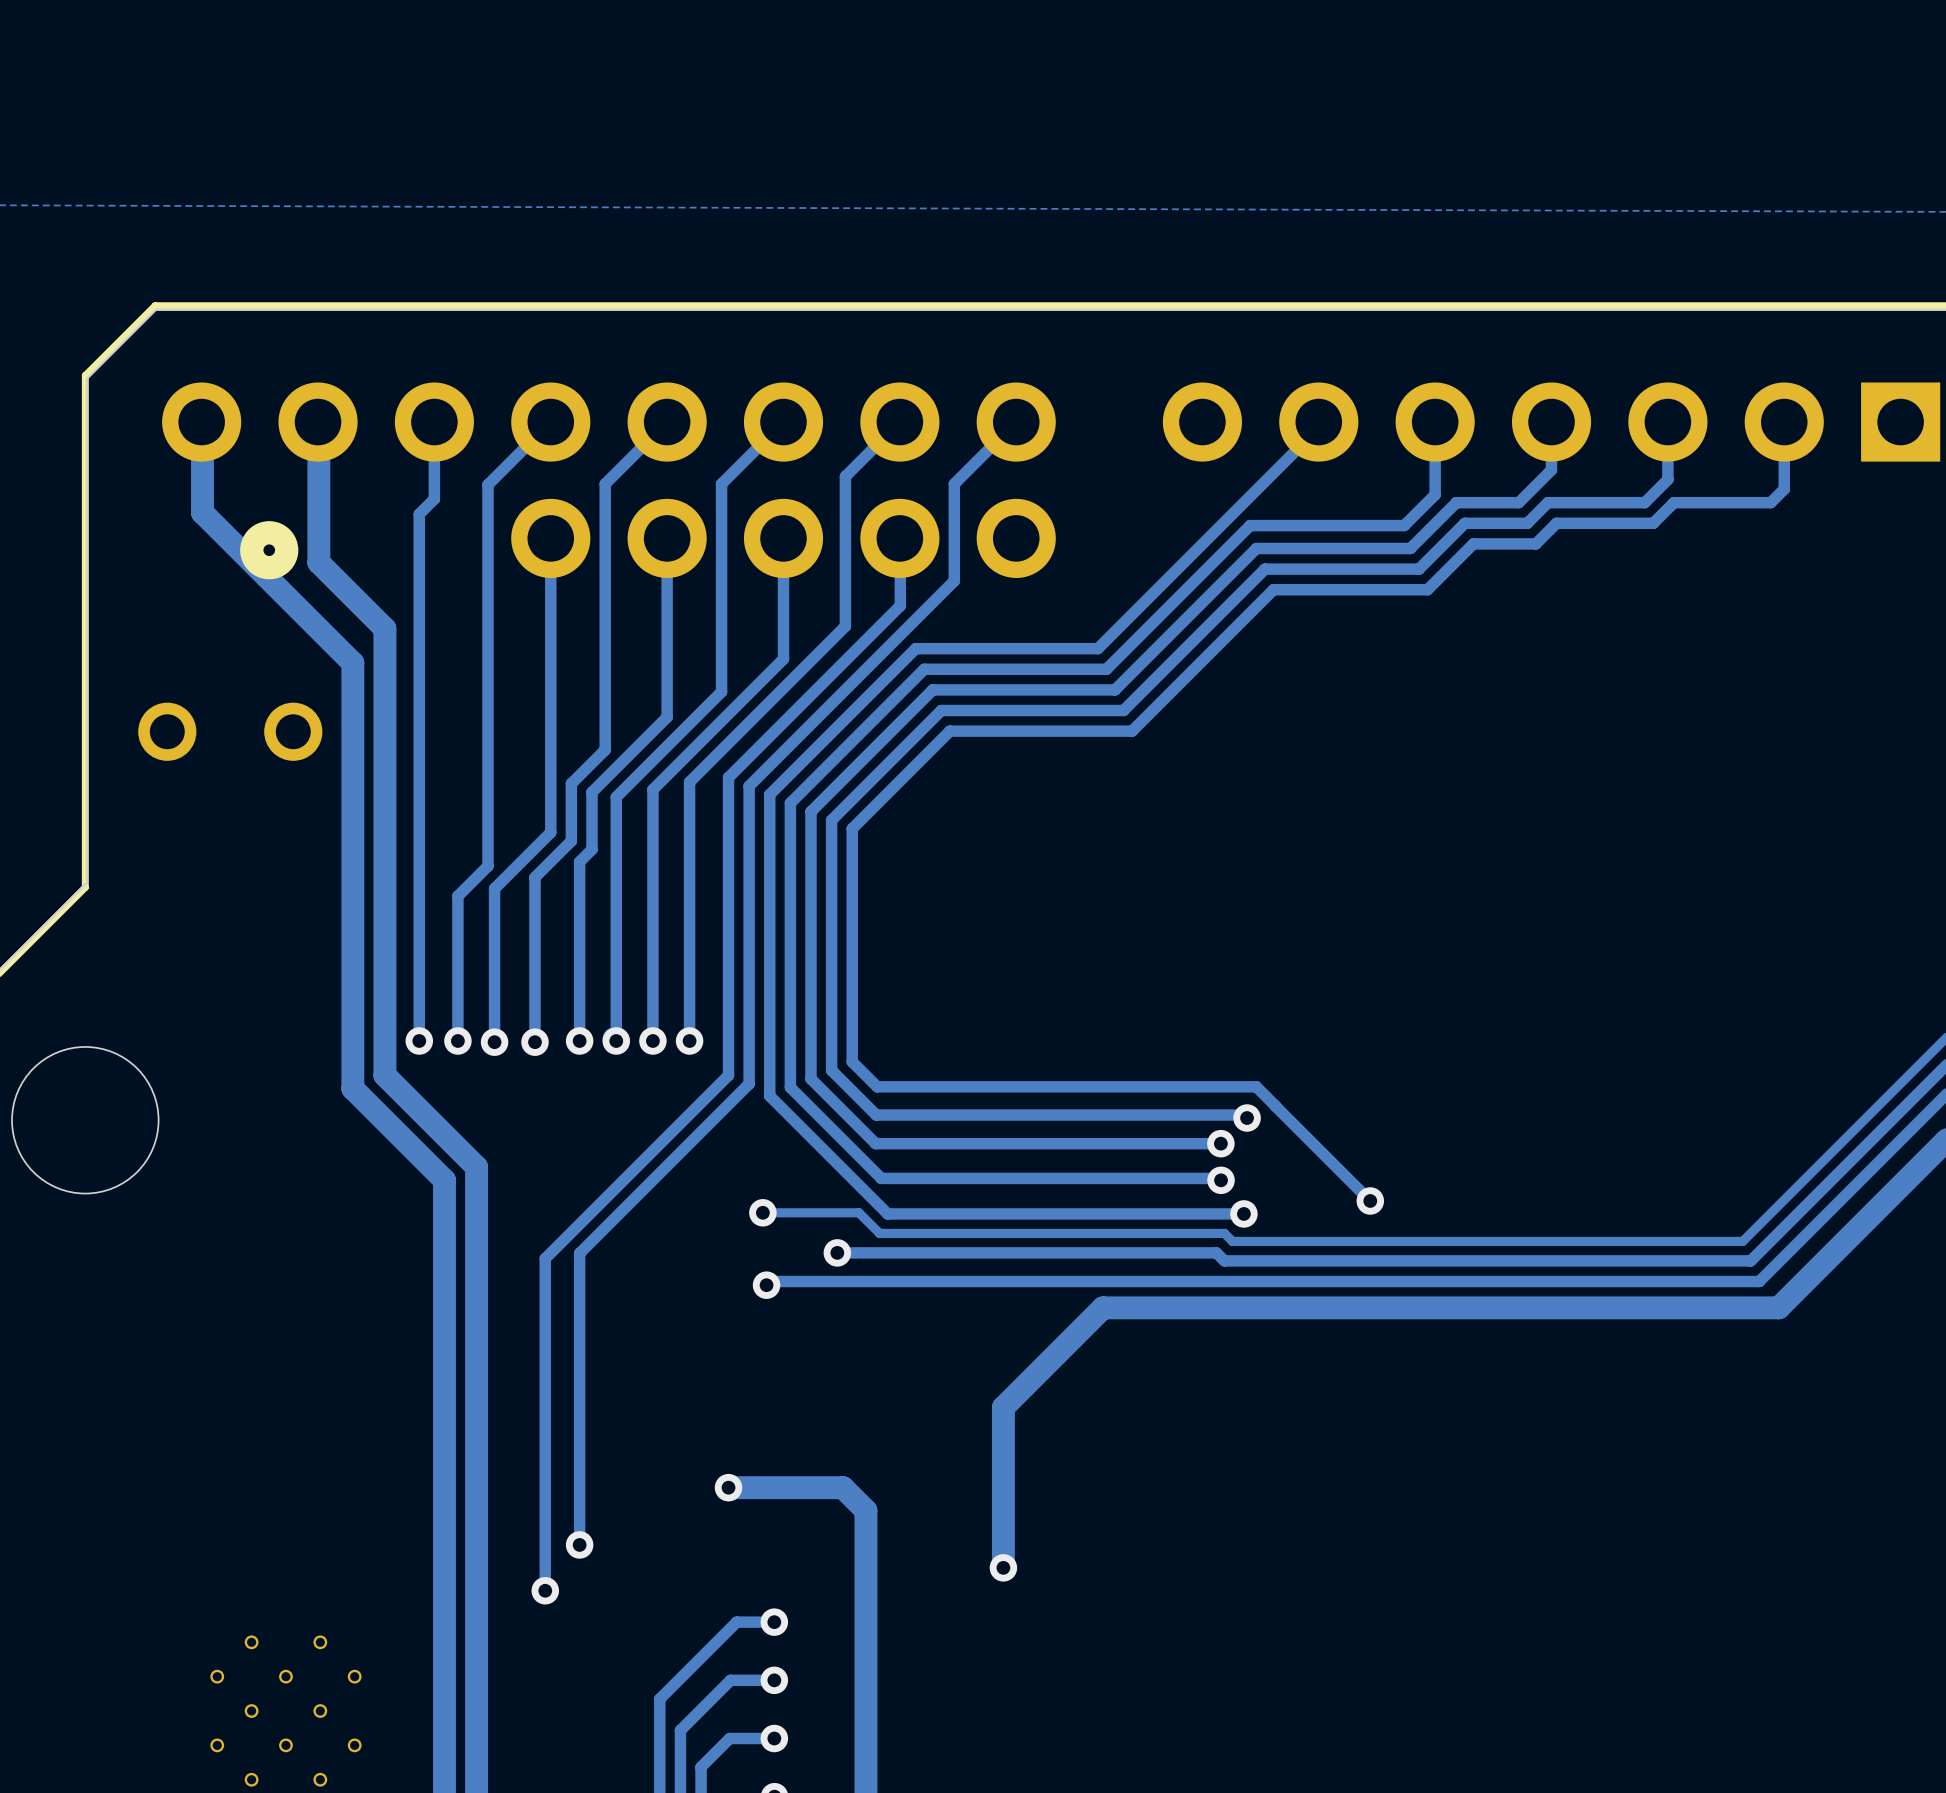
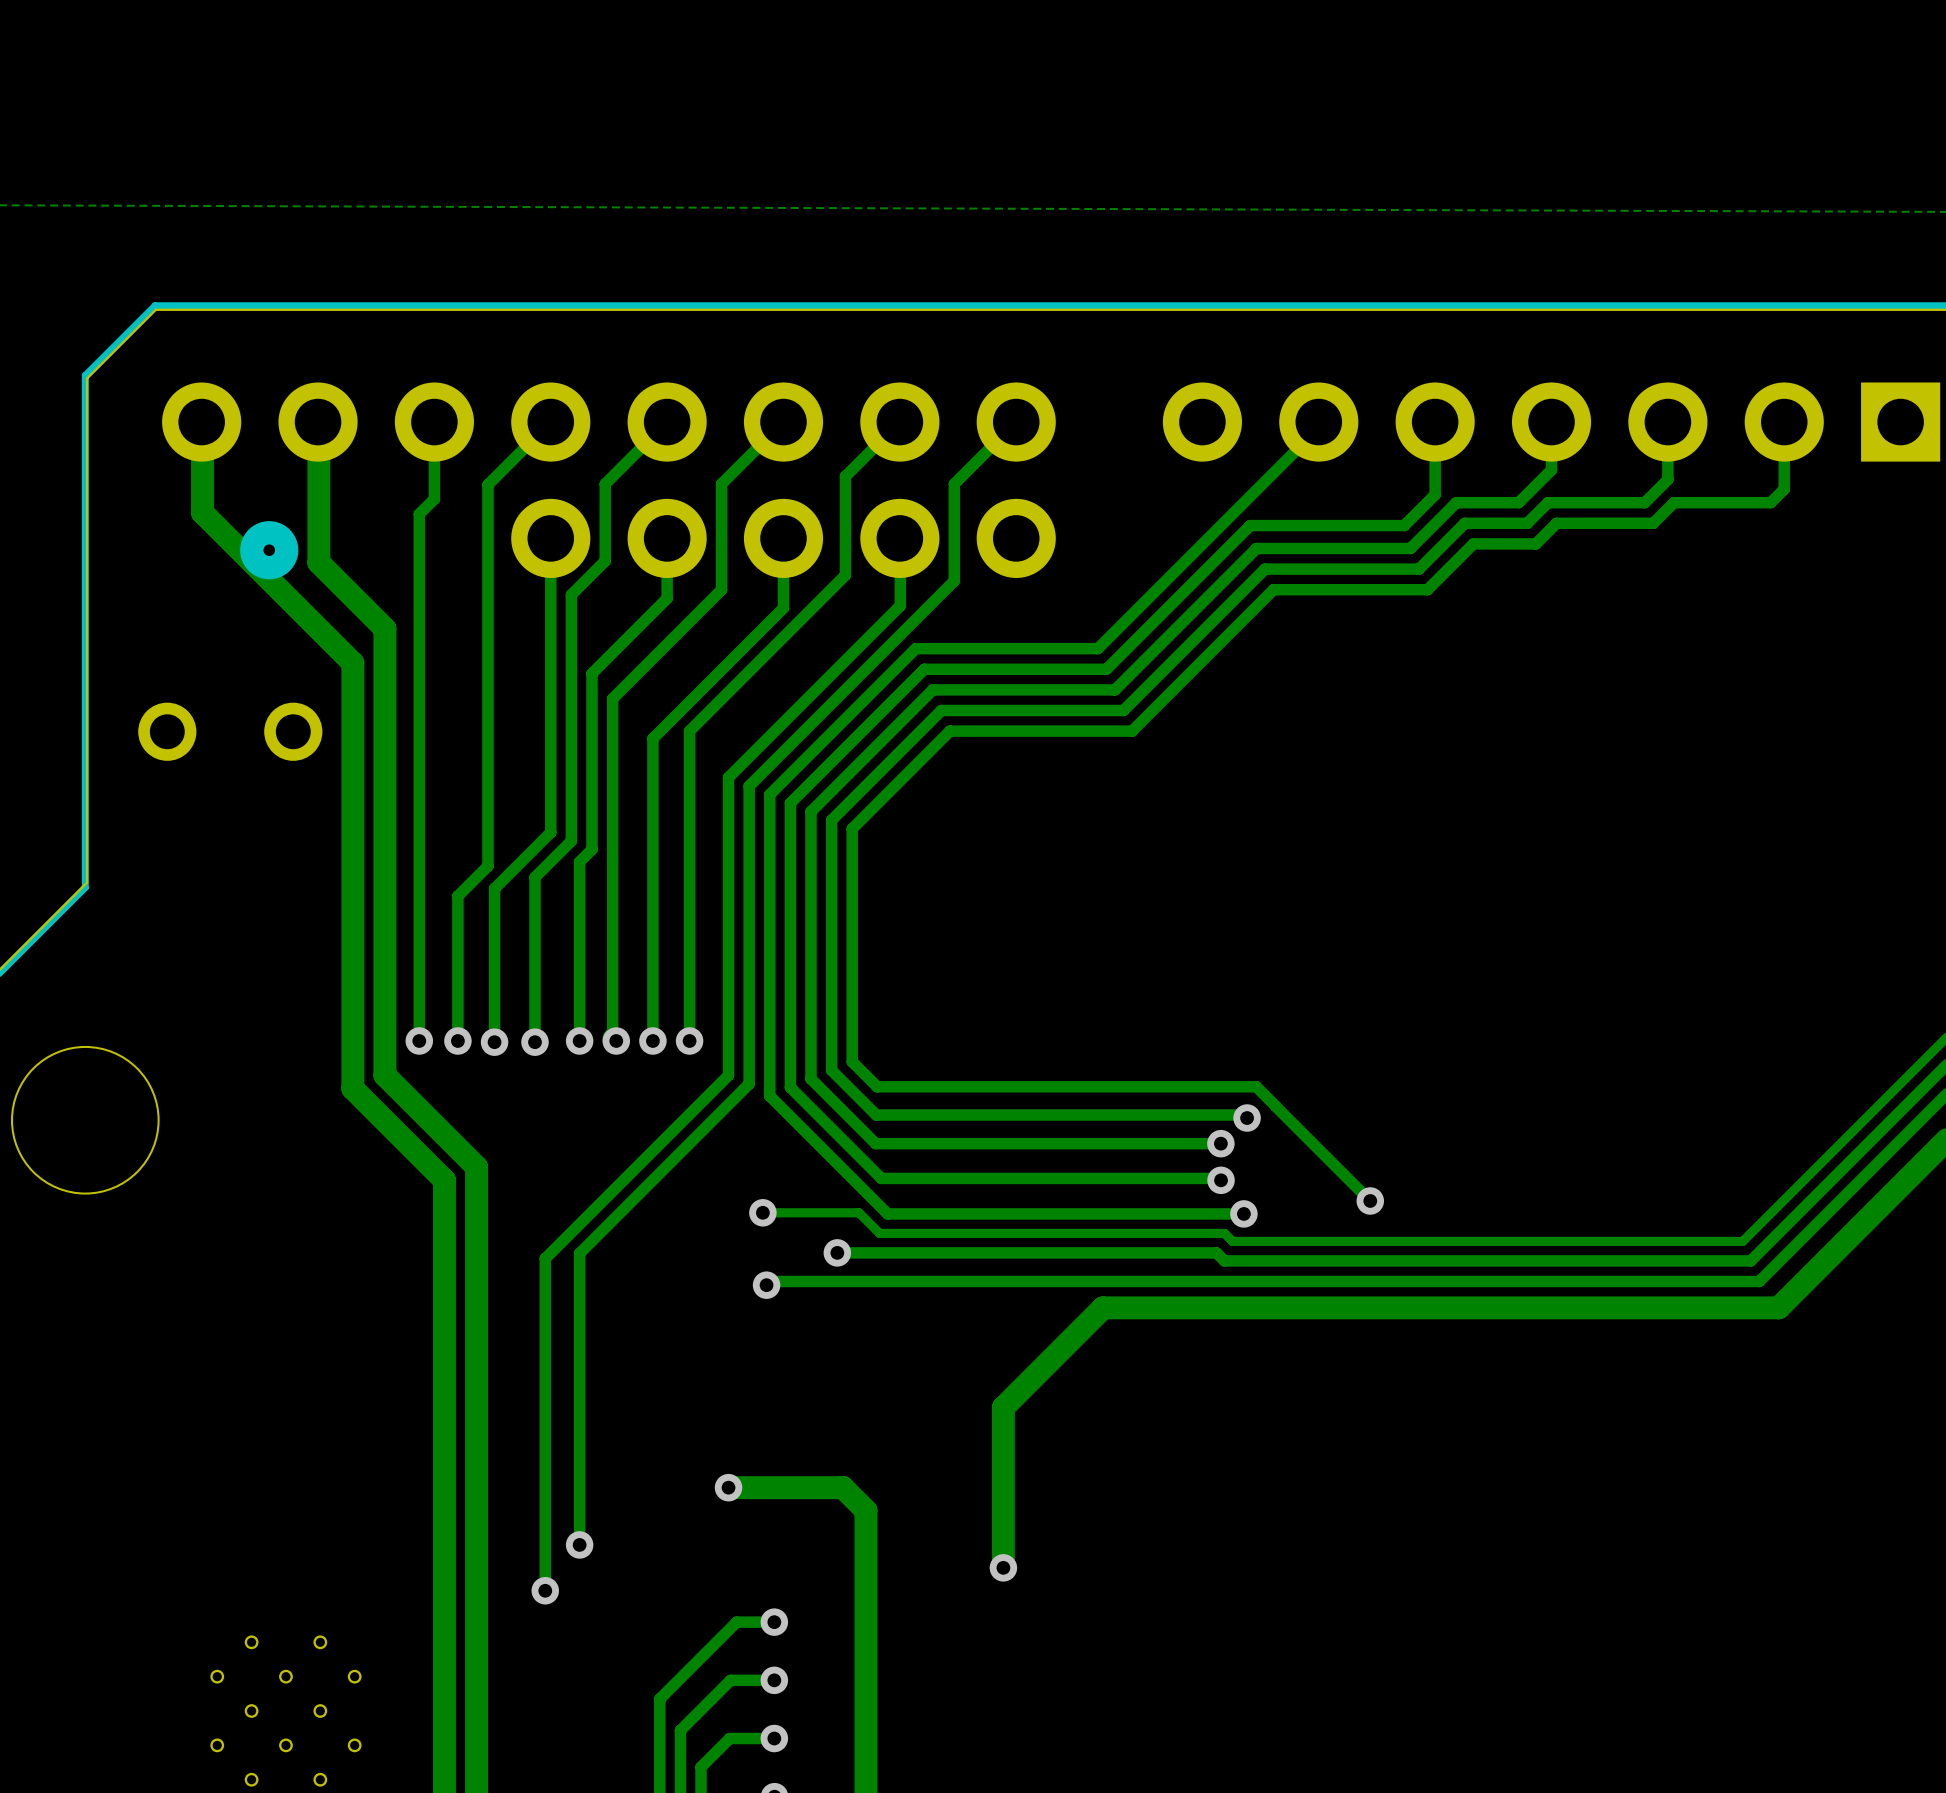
track: (605, 560) (605, 749) (571, 783) -> (605, 560) (571, 594) (571, 783)
track: (845, 575) (845, 626) (689, 782) -> (845, 575) (689, 731) (689, 782)
track: (721, 589) (721, 691) (616, 797) (616, 1040) -> (721, 589) (612, 698) (612, 1037) (616, 1040)
track: (667, 598) (667, 717) (592, 792) -> (667, 598) (592, 673) (592, 792)
track: (783, 608) (783, 659) (652, 789) -> (783, 608) (652, 738) (652, 789)

